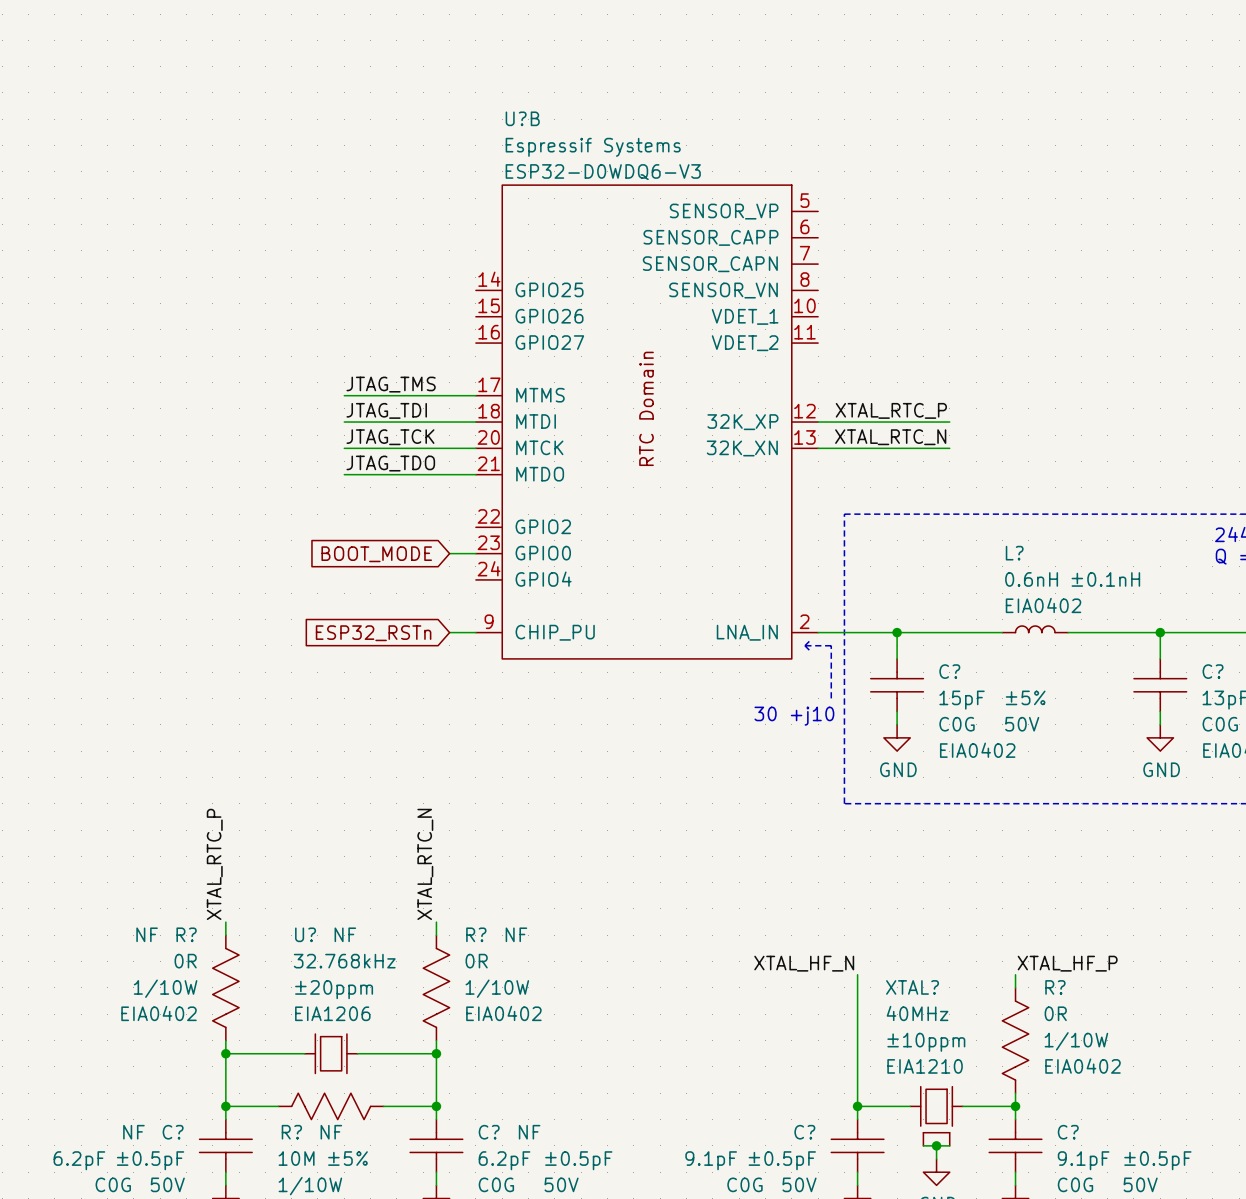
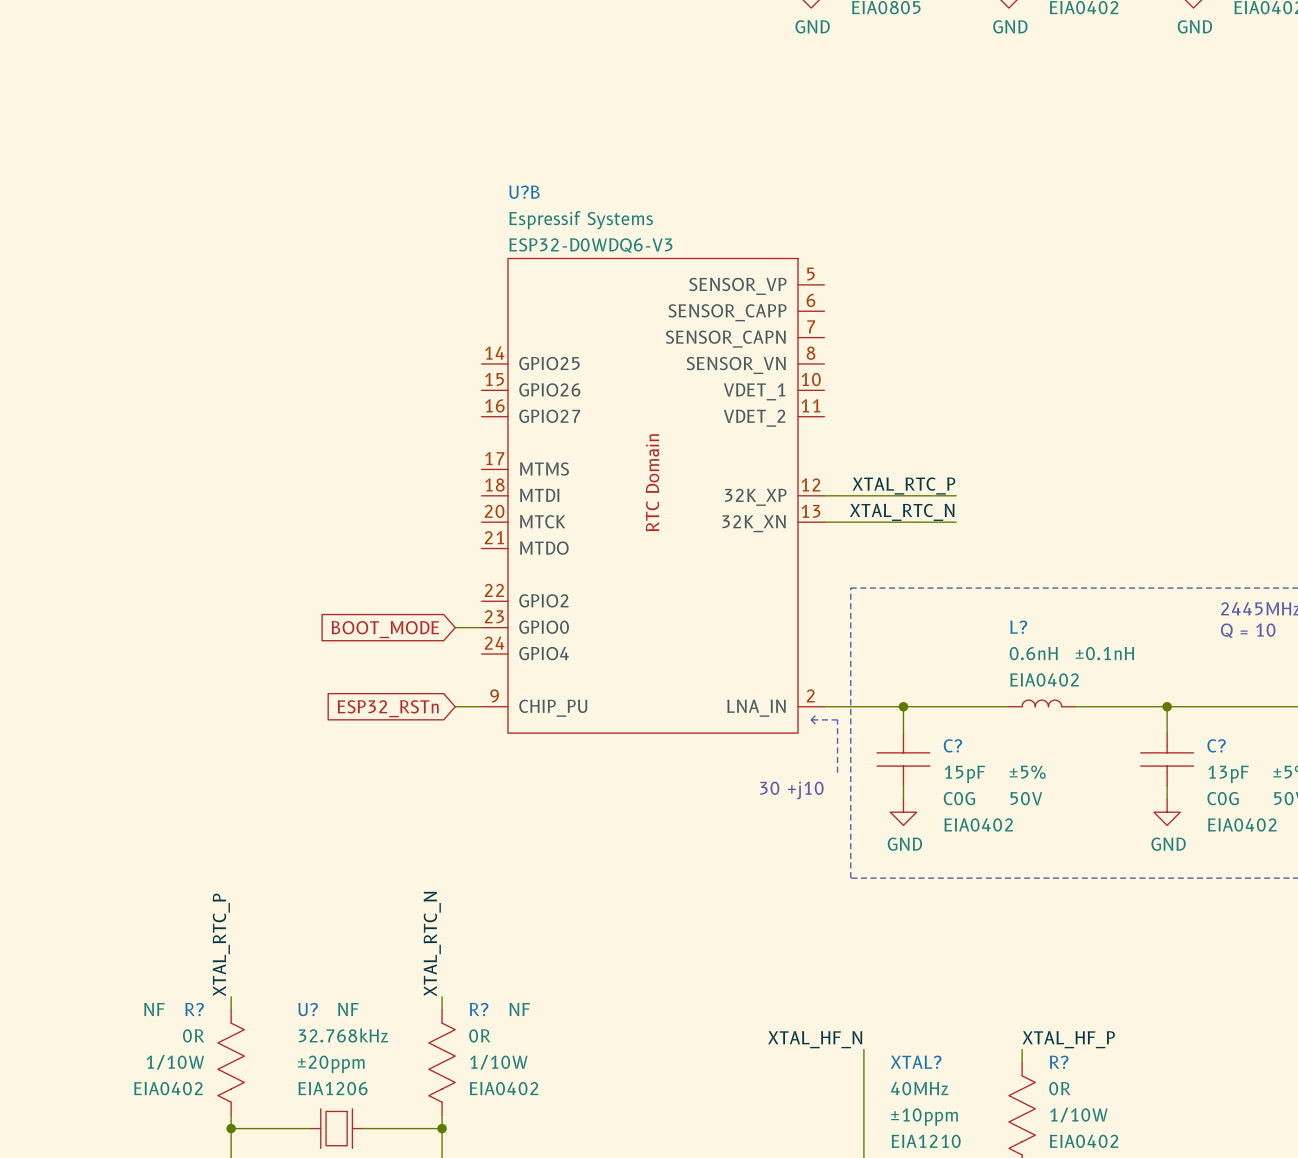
label: JTAG_TMS (391, 384) -> none
wire: (344, 395) (475, 395) -> none
label: JTAG_TDI (386, 410) -> none
wire: (344, 422) (475, 422) -> none
label: JTAG_TCK (390, 437) -> none
wire: (344, 448) (475, 448) -> none
label: JTAG_TDO (390, 463) -> none
wire: (344, 474) (475, 474) -> none

